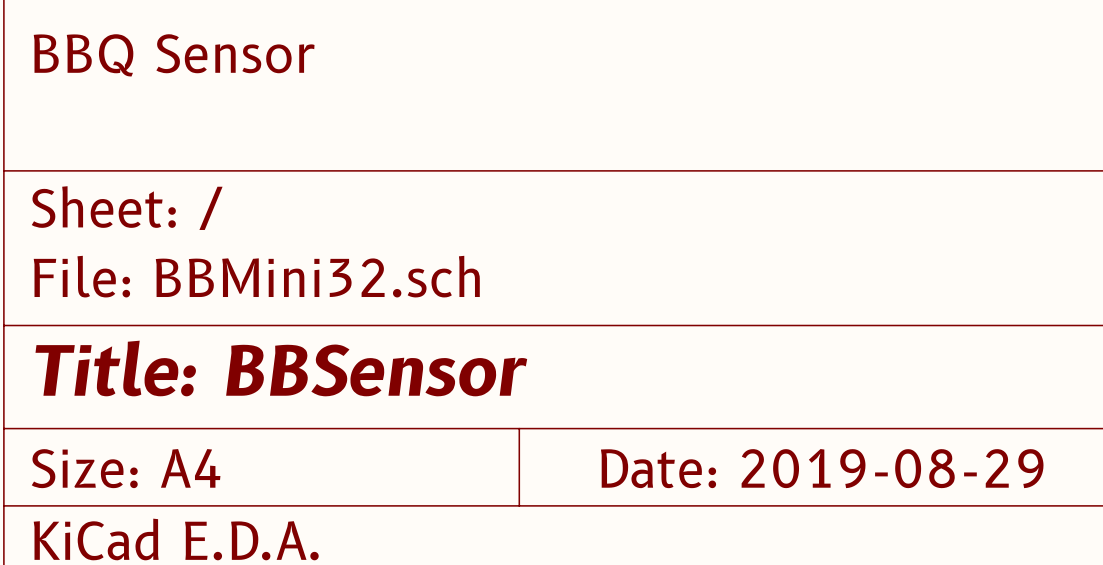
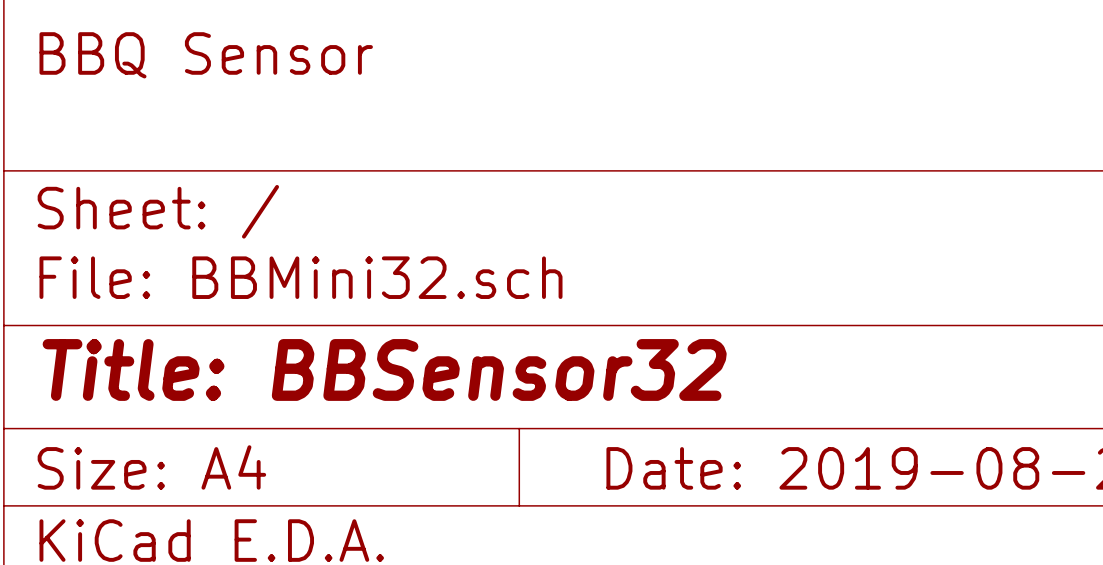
title block: Title: BBSensor (281, 368) -> Title: BBSensor32 (384, 369)

